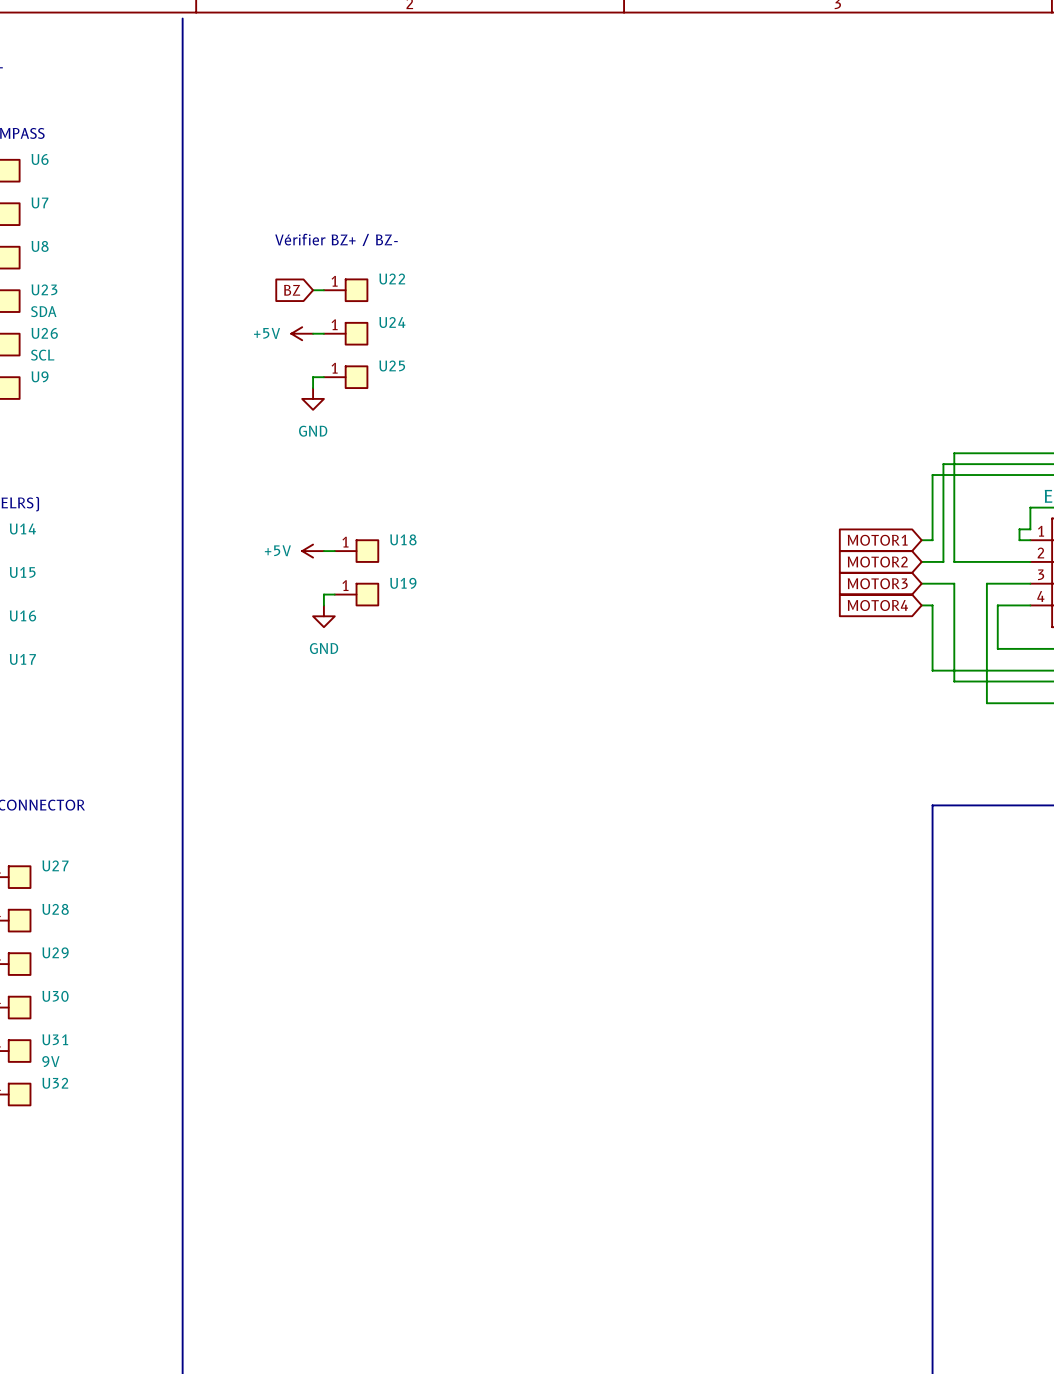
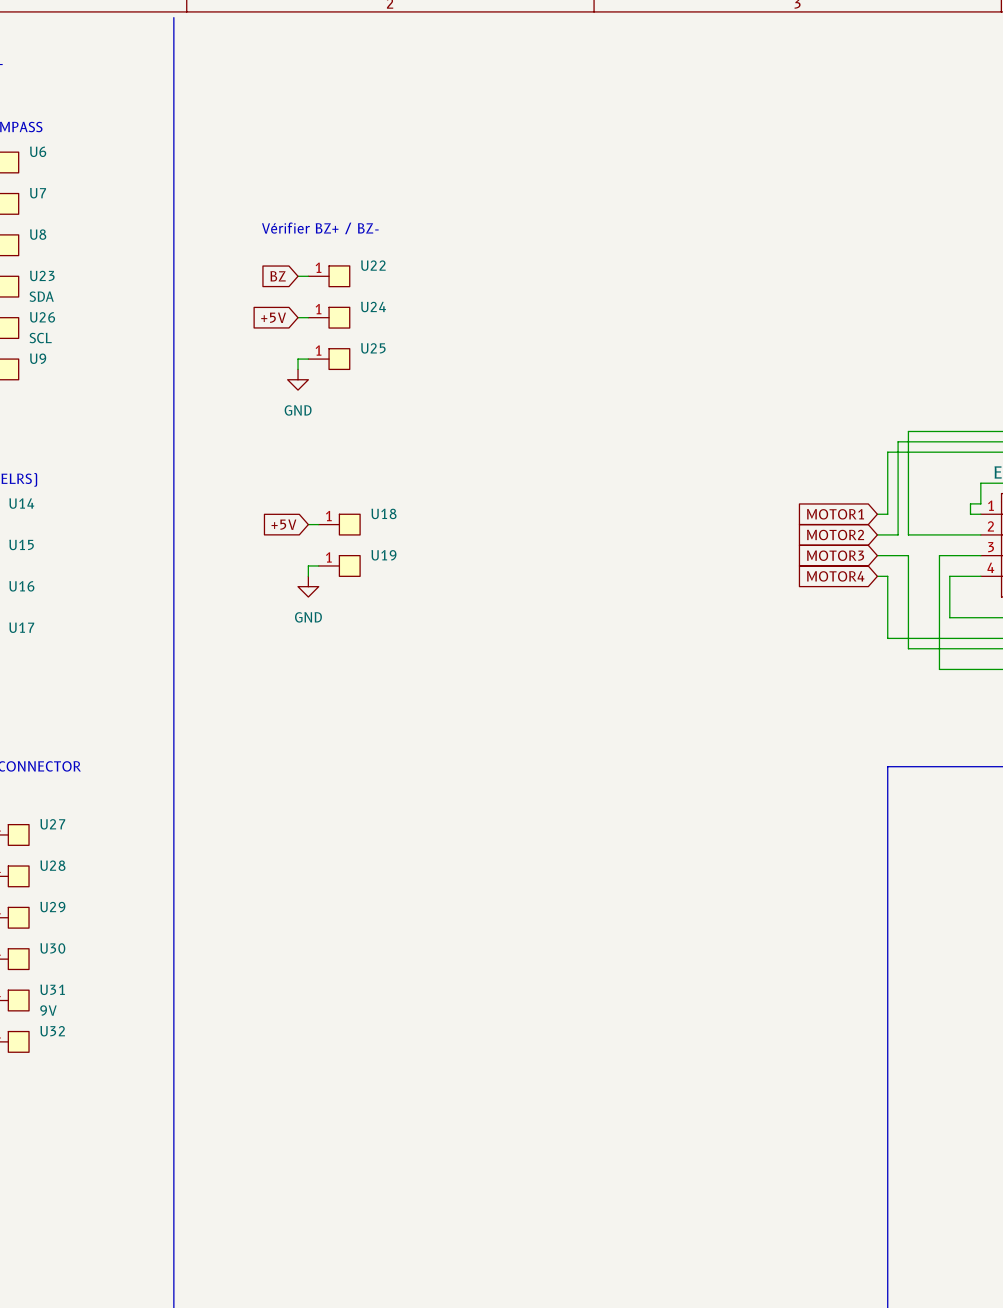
global label: none -> +5V (273, 317)
power symbol: +5V (302, 333) -> none
global label: none -> +5V (283, 524)
power symbol: +5V (313, 551) -> none

